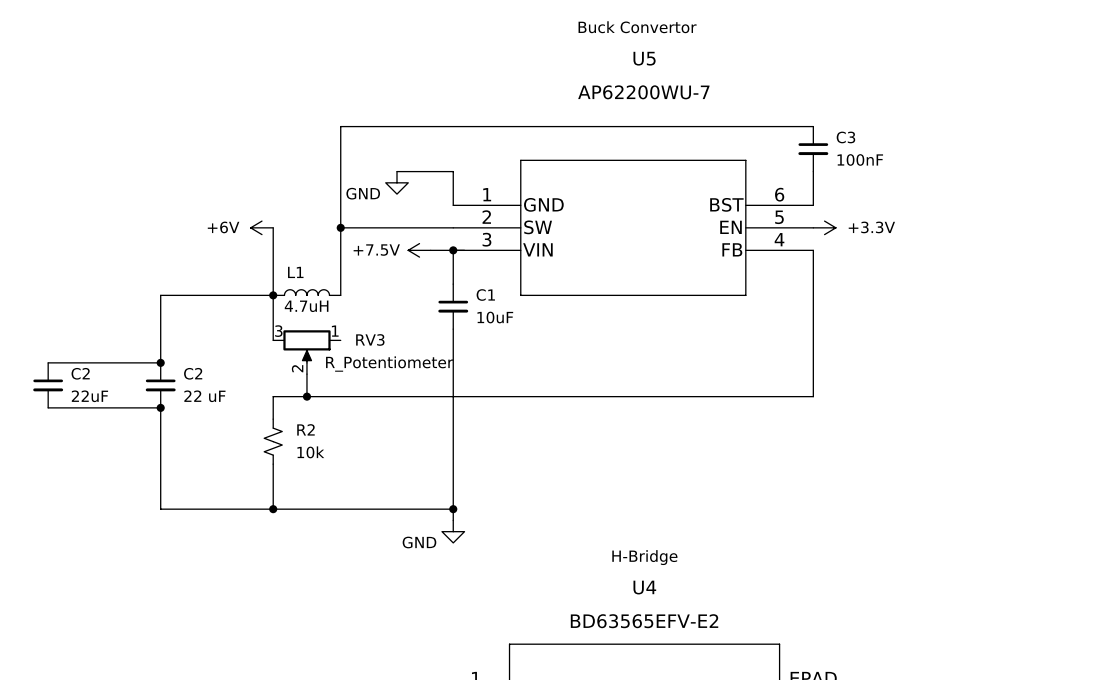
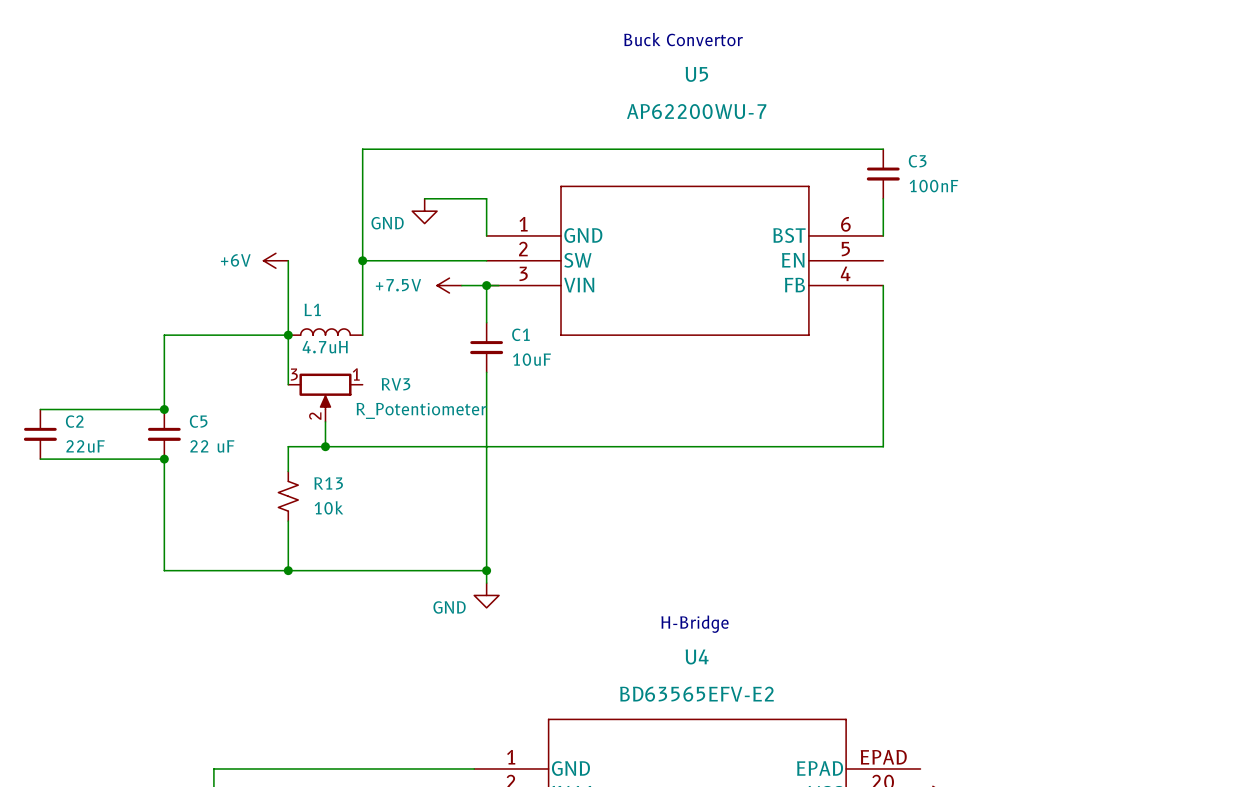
power symbol: +3.3V (824, 227) -> none
C2 name: C2 (193, 373) -> C5 (198, 421)
R2 name: R2 (305, 429) -> R13 (328, 483)

